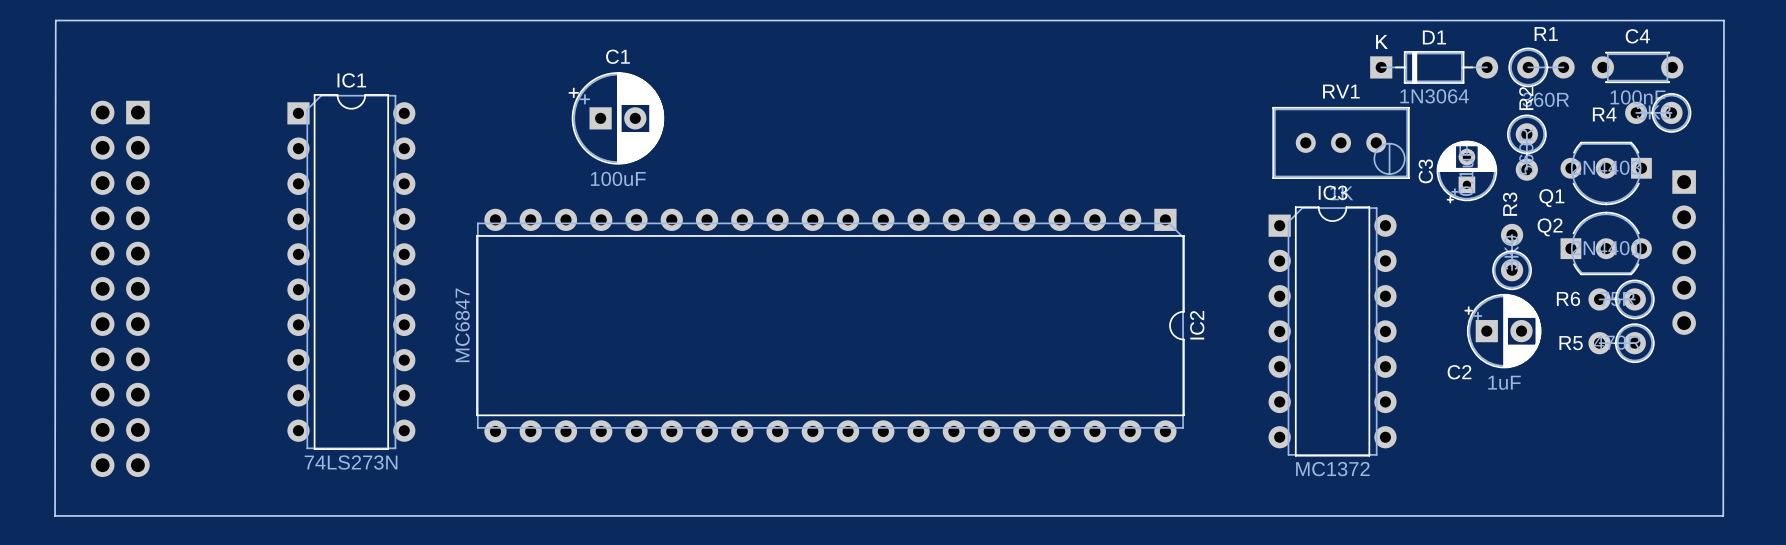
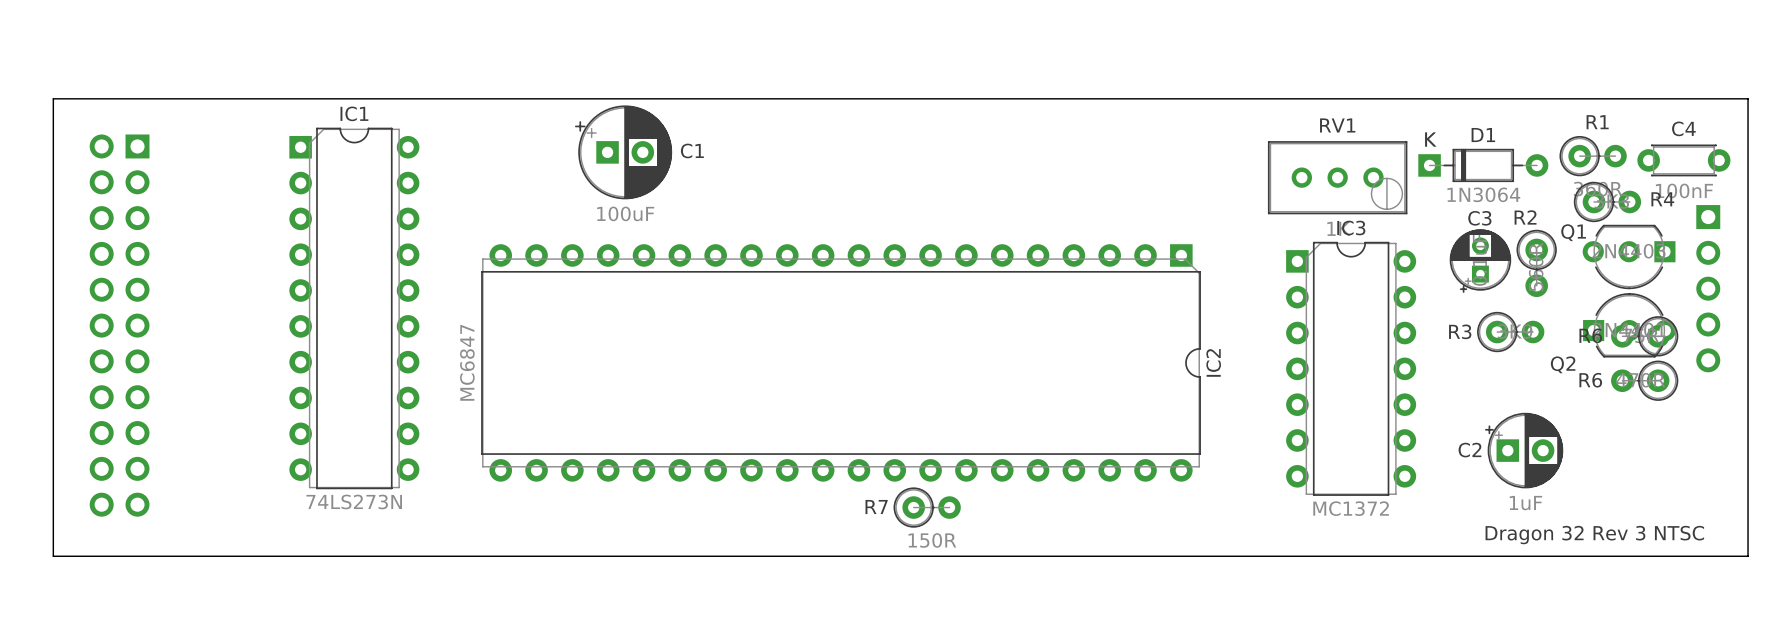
C1 name position: C1 (617, 56) -> C1 (692, 150)
D1 position: (1434, 67) -> (1483, 165)
R1 position: (1541, 67) -> (1593, 156)
C4 position: (1637, 67) -> (1683, 160)
R2 name rotation: 0° (1526, 98) -> 90° clockwise (1525, 217)
RV1 footprint: [1272, 106, 1410, 179] -> [1267, 141, 1408, 215]
R4 rotation: 0° (1658, 112) -> 180° (1607, 201)
R4 position: (1658, 112) -> (1607, 201)
R2 position: (1526, 147) -> (1536, 263)
C3 name rotation: 0° (1425, 171) -> 90° clockwise (1479, 218)
C3 name position: C3 (1425, 171) -> C3 (1479, 218)
C3 position: (1466, 172) -> (1480, 261)
Q1 position: (1606, 173) -> (1629, 257)
R3 name position: R3 (1510, 204) -> R3 (1460, 331)
Q2 name position: Q2 (1550, 227) -> Q2 (1563, 364)
Q2 position: (1606, 243) -> (1629, 325)
R3 rotation: 0° (1512, 256) -> 90° clockwise (1510, 332)
R3 position: (1512, 256) -> (1510, 332)
C2 position: (1502, 331) -> (1524, 450)
R5 name: R5 (1571, 343) -> R6 (1590, 380)
C2 name position: C2 (1459, 372) -> C2 (1469, 450)
R7: none -> 150R (927, 507)
text: none -> Dragon 32 Rev 3 NTSC (1594, 535)
board edge: (55, 515) (55, 20) (1723, 20) (1723, 515) -> (53, 556) (53, 98) (1748, 98) (1748, 556)

